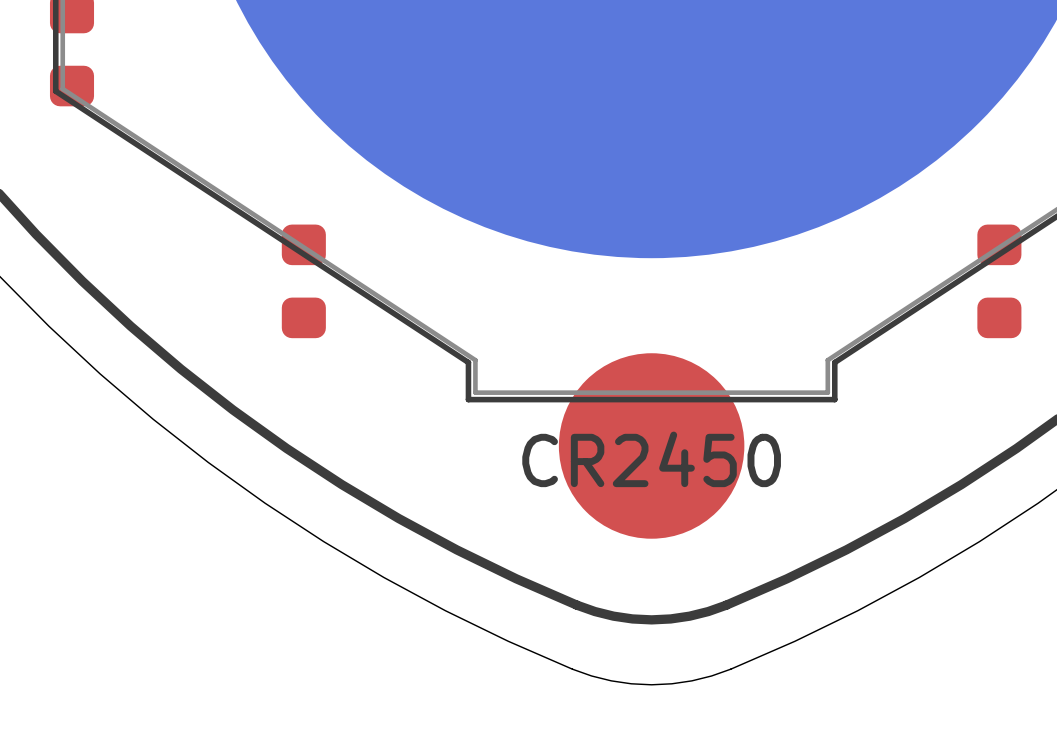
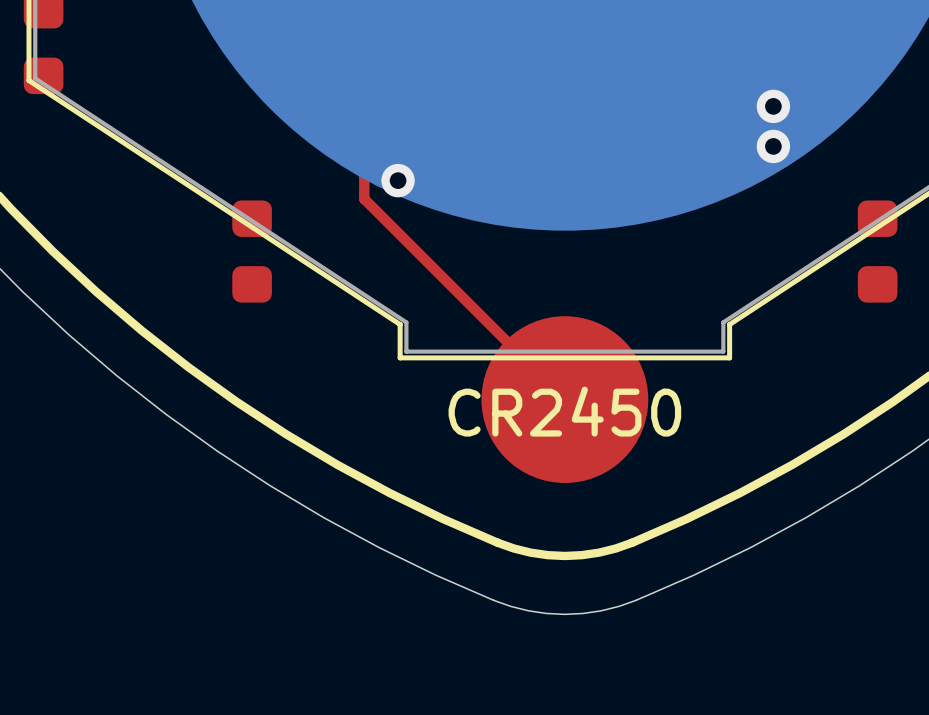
via: none -> (773, 106)
top track: none -> (519, 107) (385, 106) (364, 127) (364, 198) (564, 399)
via: none -> (773, 146)
via: none -> (398, 180)

